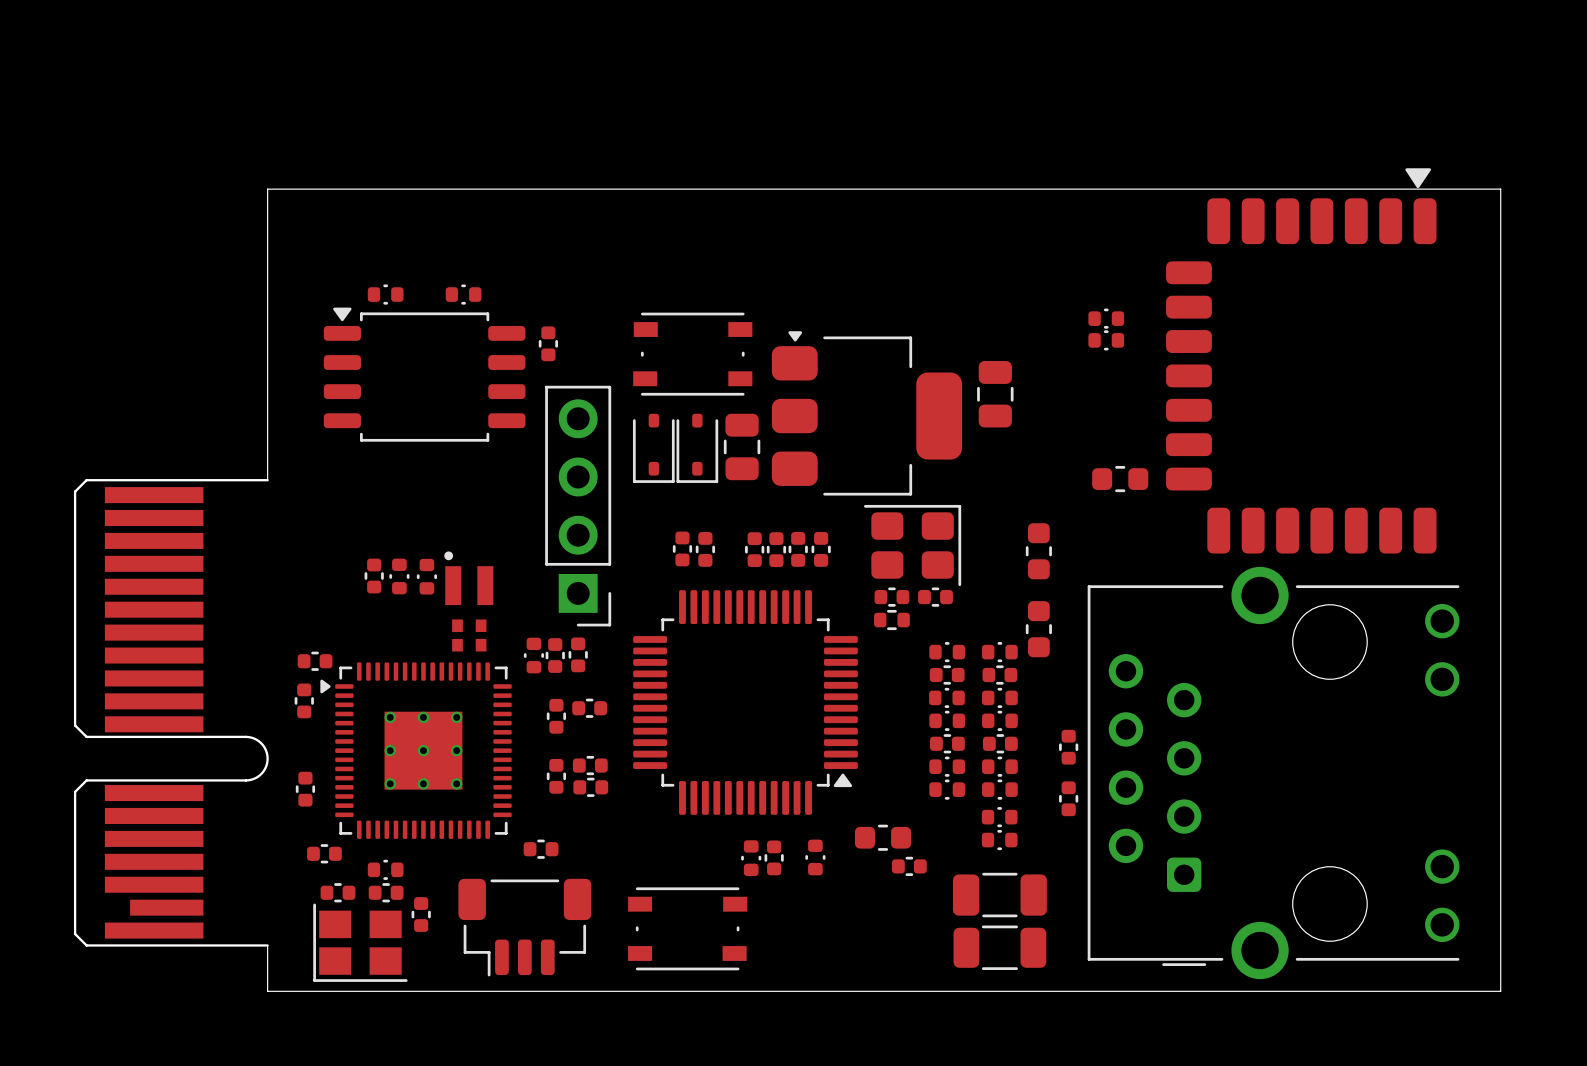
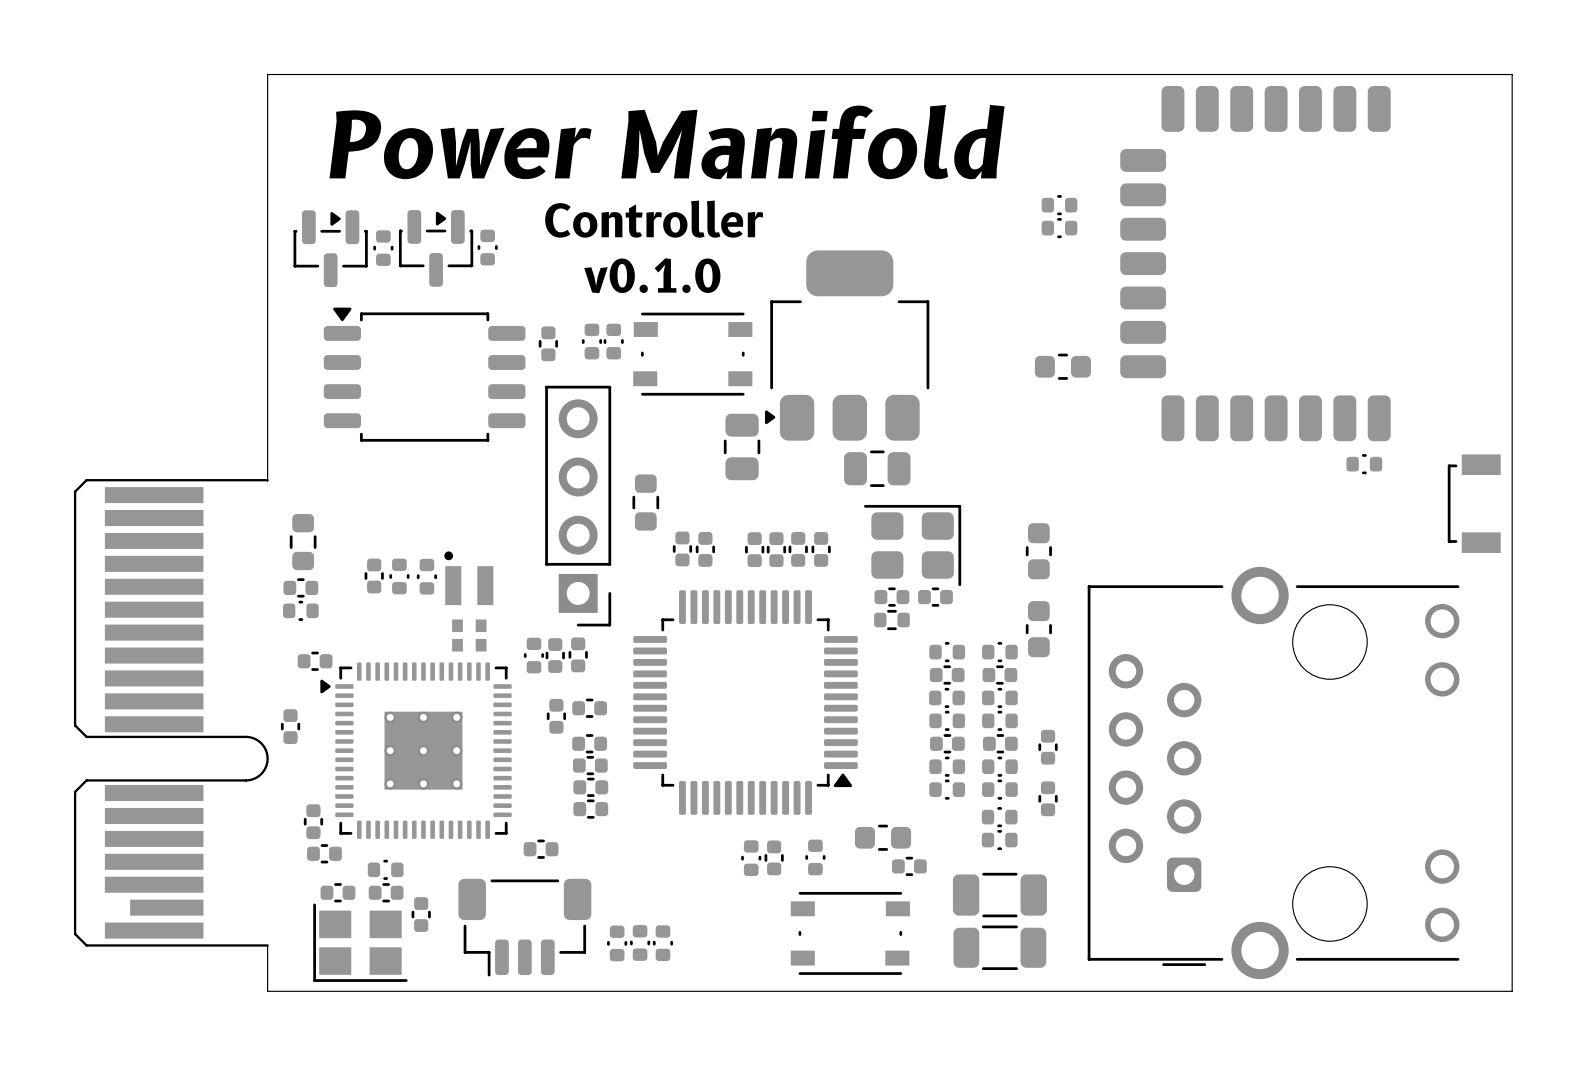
text: none -> Power Manifold (667, 142)
board edge: (267, 189) (1500, 189) (1500, 991) -> (267, 189) (267, 74) (1512, 74) (1512, 991) (1500, 991)
part: none -> (1059, 205)
text: none -> Controller (654, 219)
part: none -> (1059, 228)
part: none -> (487, 247)
part: none -> (330, 248)
part: none -> (383, 248)
part: none -> (436, 248)
part: none -> (1255, 263)
text: none -> v0.1.0 (652, 275)
part: (385, 294) -> none
part: (463, 294) -> none
part: (1106, 318) -> none
part: (1106, 340) -> none
part: none -> (591, 341)
part: none -> (613, 341)
part: (1301, 360) -> none
part rotation: 0° (995, 394) -> 90° clockwise (877, 468)
part position: (995, 394) -> (877, 468)
part rotation: 0° (866, 413) -> 90° counterclockwise (847, 345)
part: (653, 448) -> none
part: (697, 448) -> none
part: none -> (1364, 464)
part position: (1120, 479) -> (1062, 366)
part: none -> (645, 502)
part: none -> (1474, 503)
part: none -> (303, 542)
part: none -> (300, 587)
part: none -> (300, 610)
part position: (304, 700) -> (290, 726)
part: none -> (589, 743)
part position: (1068, 747) -> (1048, 747)
part: (556, 776) -> none
part: (305, 789) -> none
part position: (1068, 798) -> (1048, 798)
part: none -> (590, 809)
part: none -> (313, 821)
part position: (687, 928) -> (850, 933)
part: none -> (640, 942)
part: none -> (617, 943)
part: none -> (662, 943)

